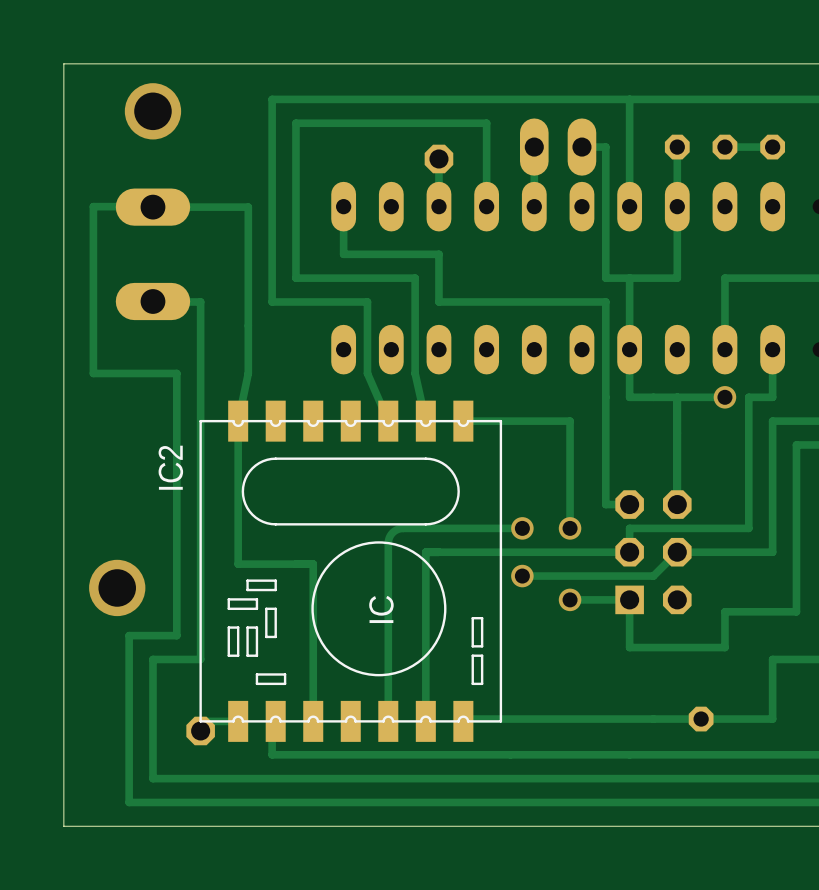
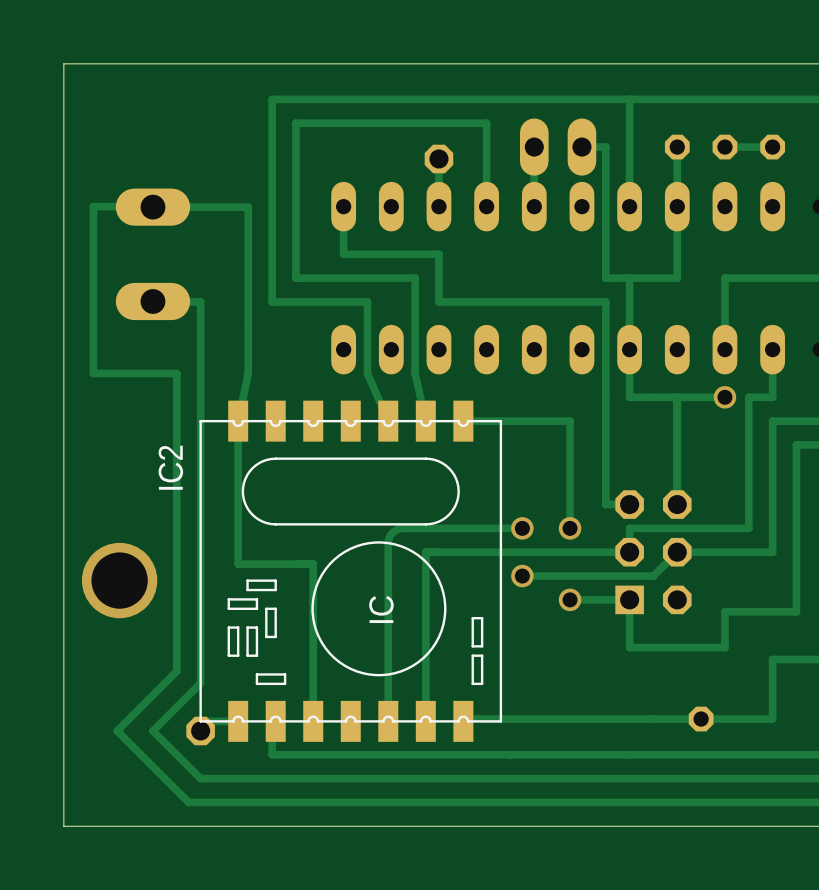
via: (152, 111) -> none
via size: [89, 559, 146, 617] -> [81, 542, 158, 619]
track: (176, 635) (129, 635) (129, 802) (188, 802) -> (176, 635) (176, 671) (117, 730) (188, 802)
track: (200, 659) (152, 659) (152, 778) (200, 778) -> (200, 659) (200, 683) (152, 730) (200, 778)

